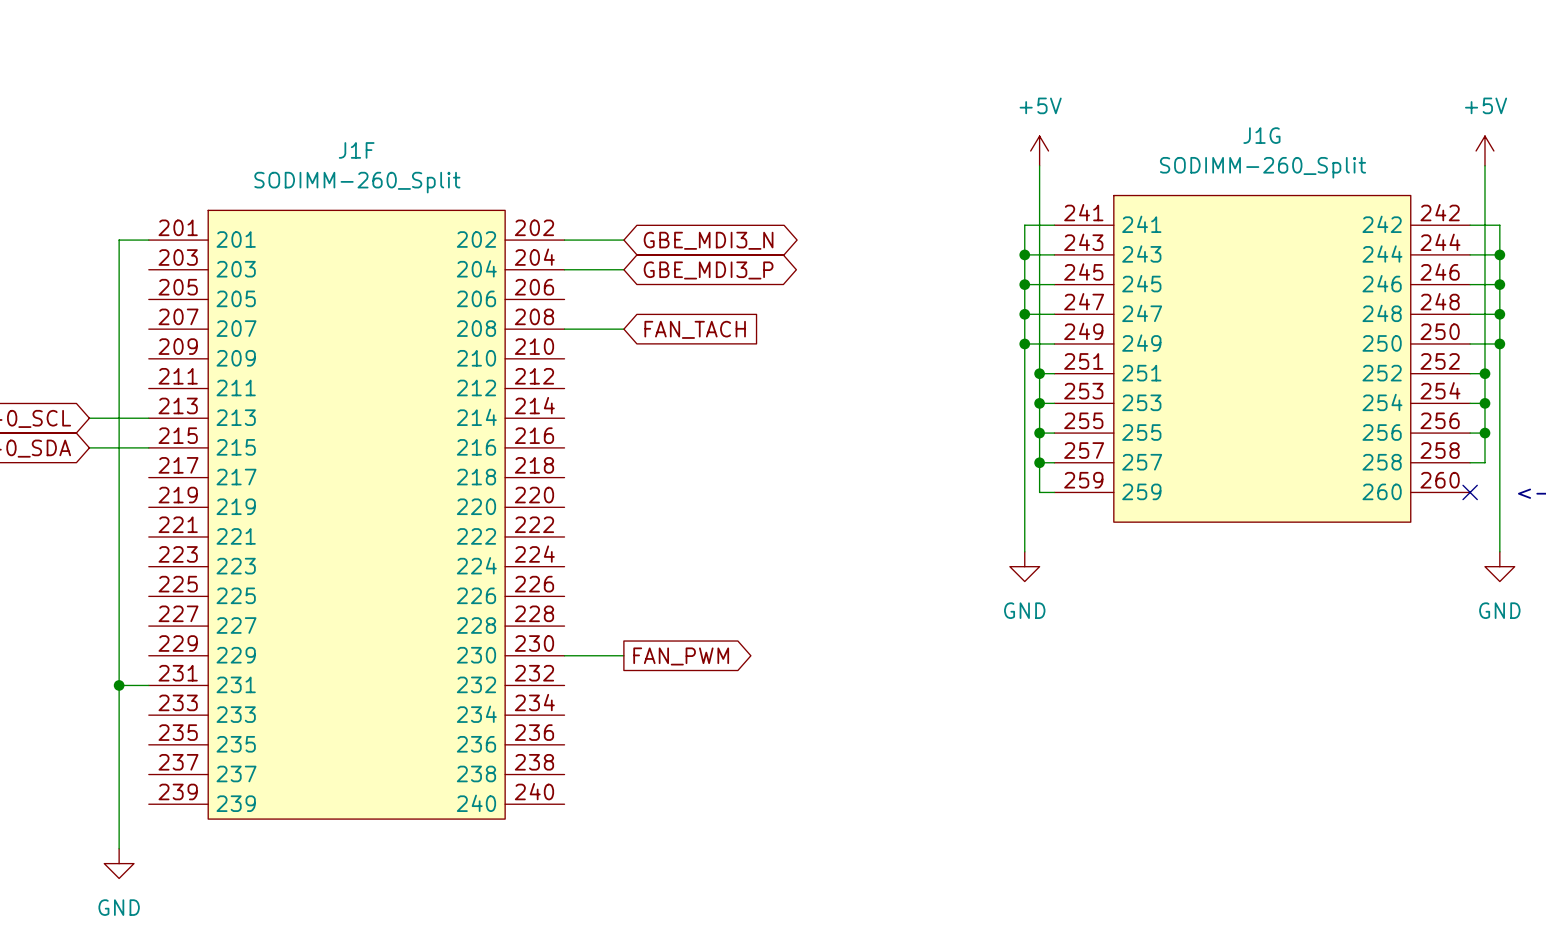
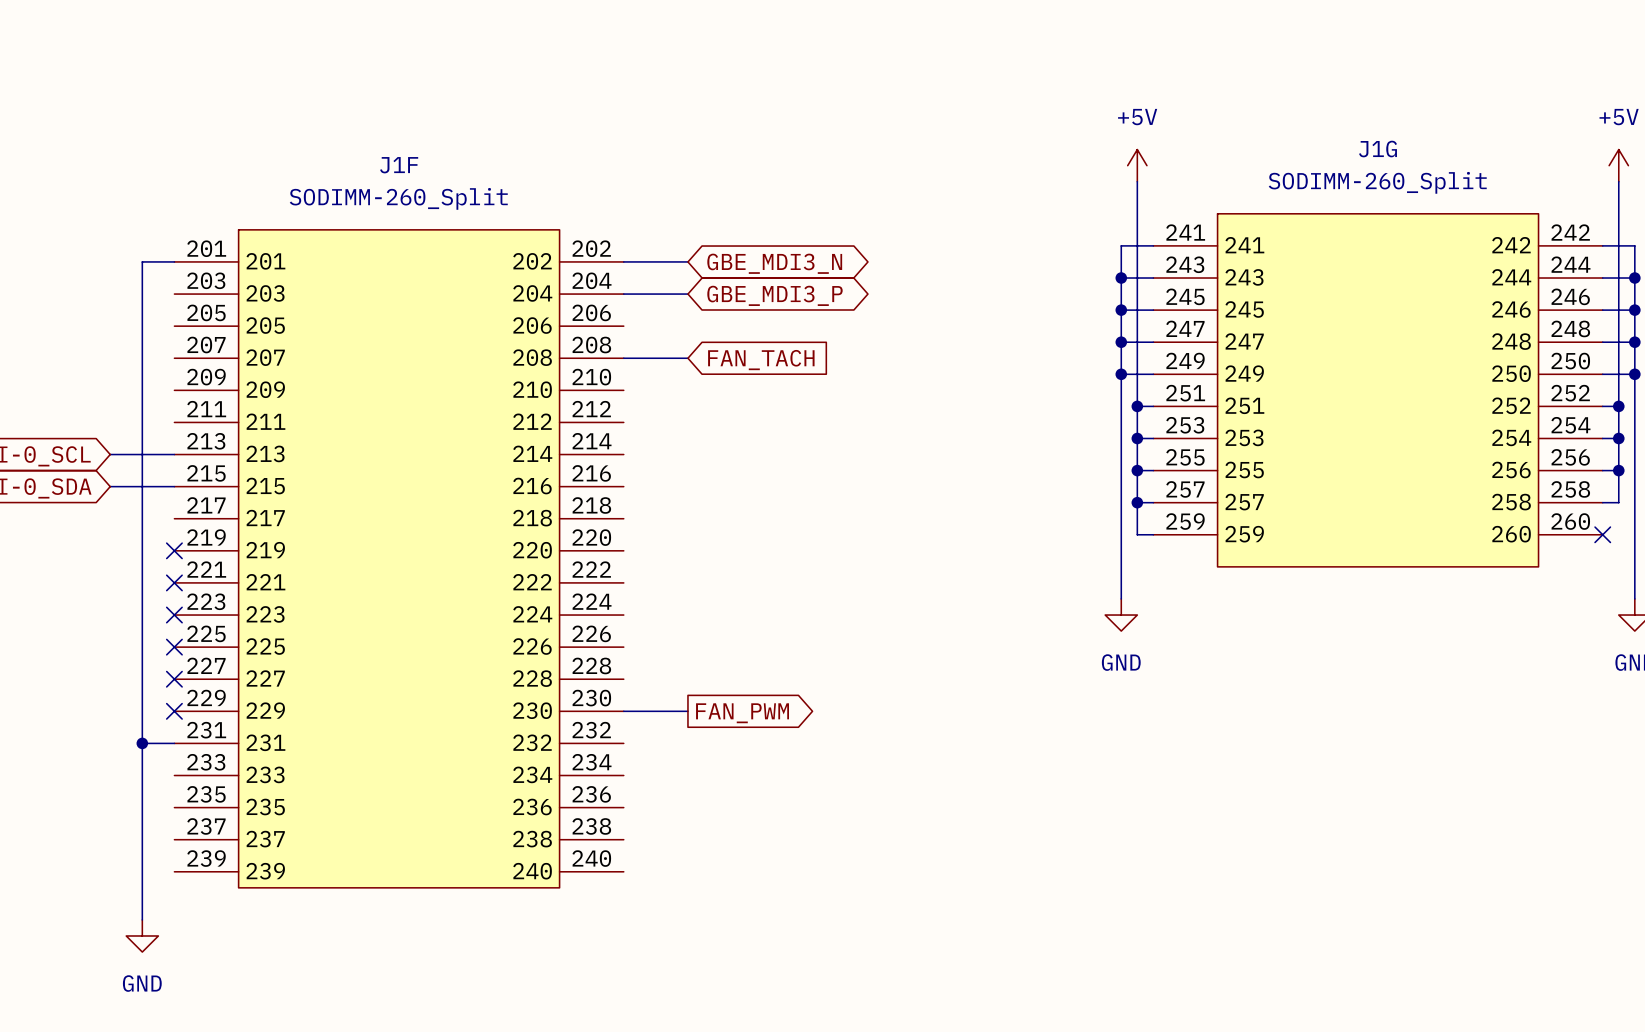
no-connect mark: none -> (174, 550)
no-connect mark: none -> (174, 582)
no-connect mark: none -> (174, 615)
no-connect mark: none -> (174, 647)
no-connect mark: none -> (174, 679)
no-connect mark: none -> (174, 711)

